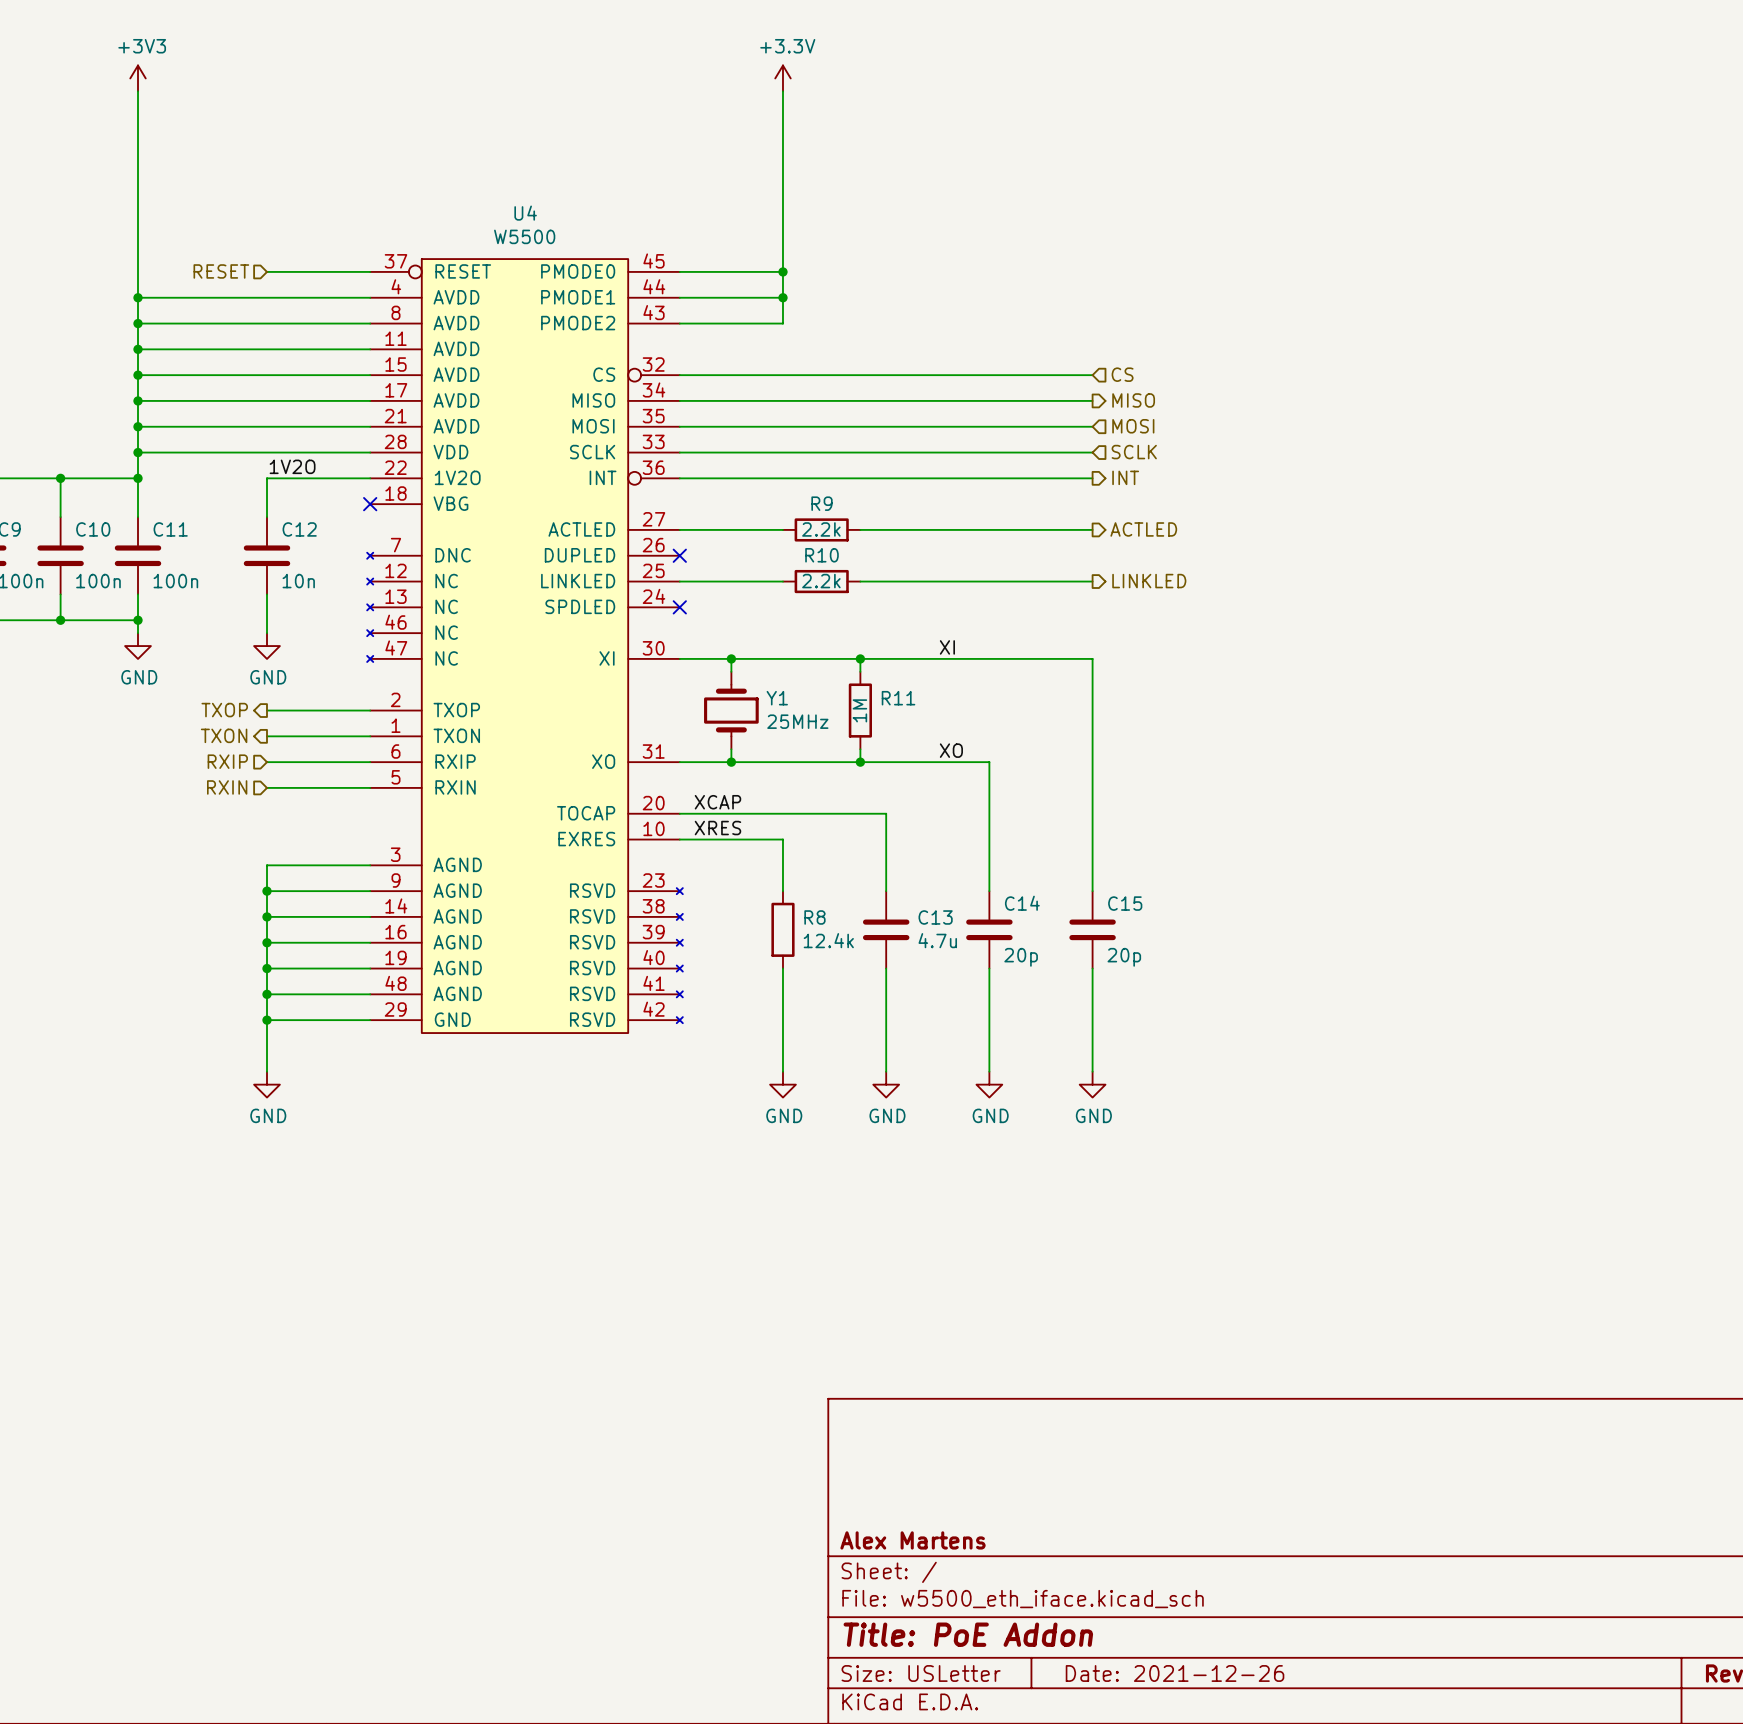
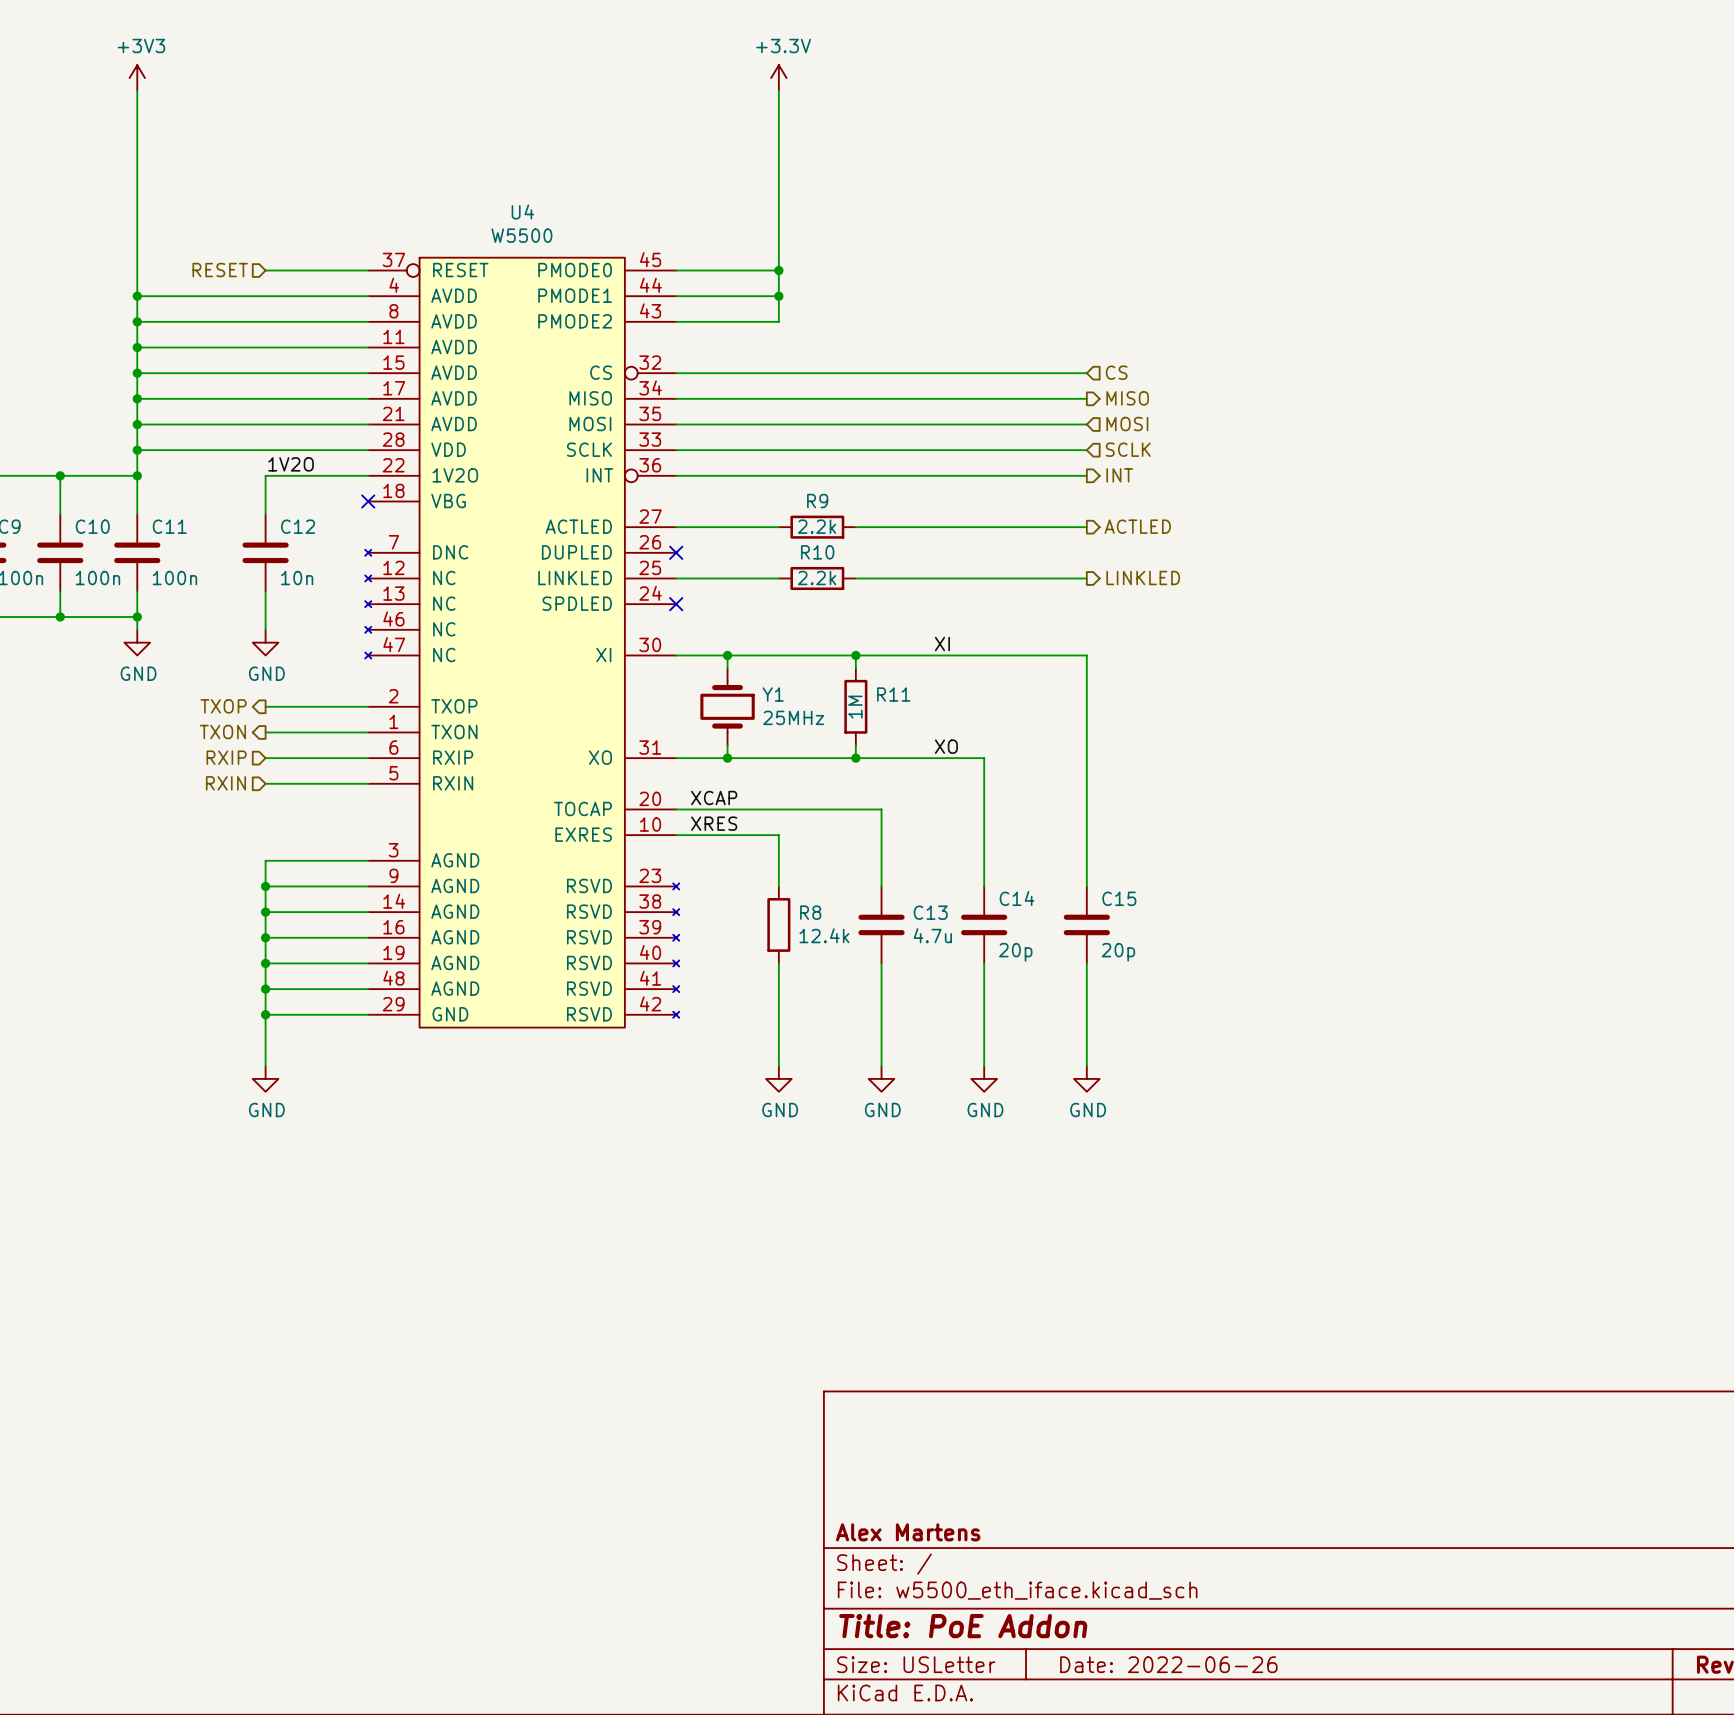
title block: Date: 2021-12-26 (1175, 1673) -> Date: 2022-06-26 (1168, 1664)

